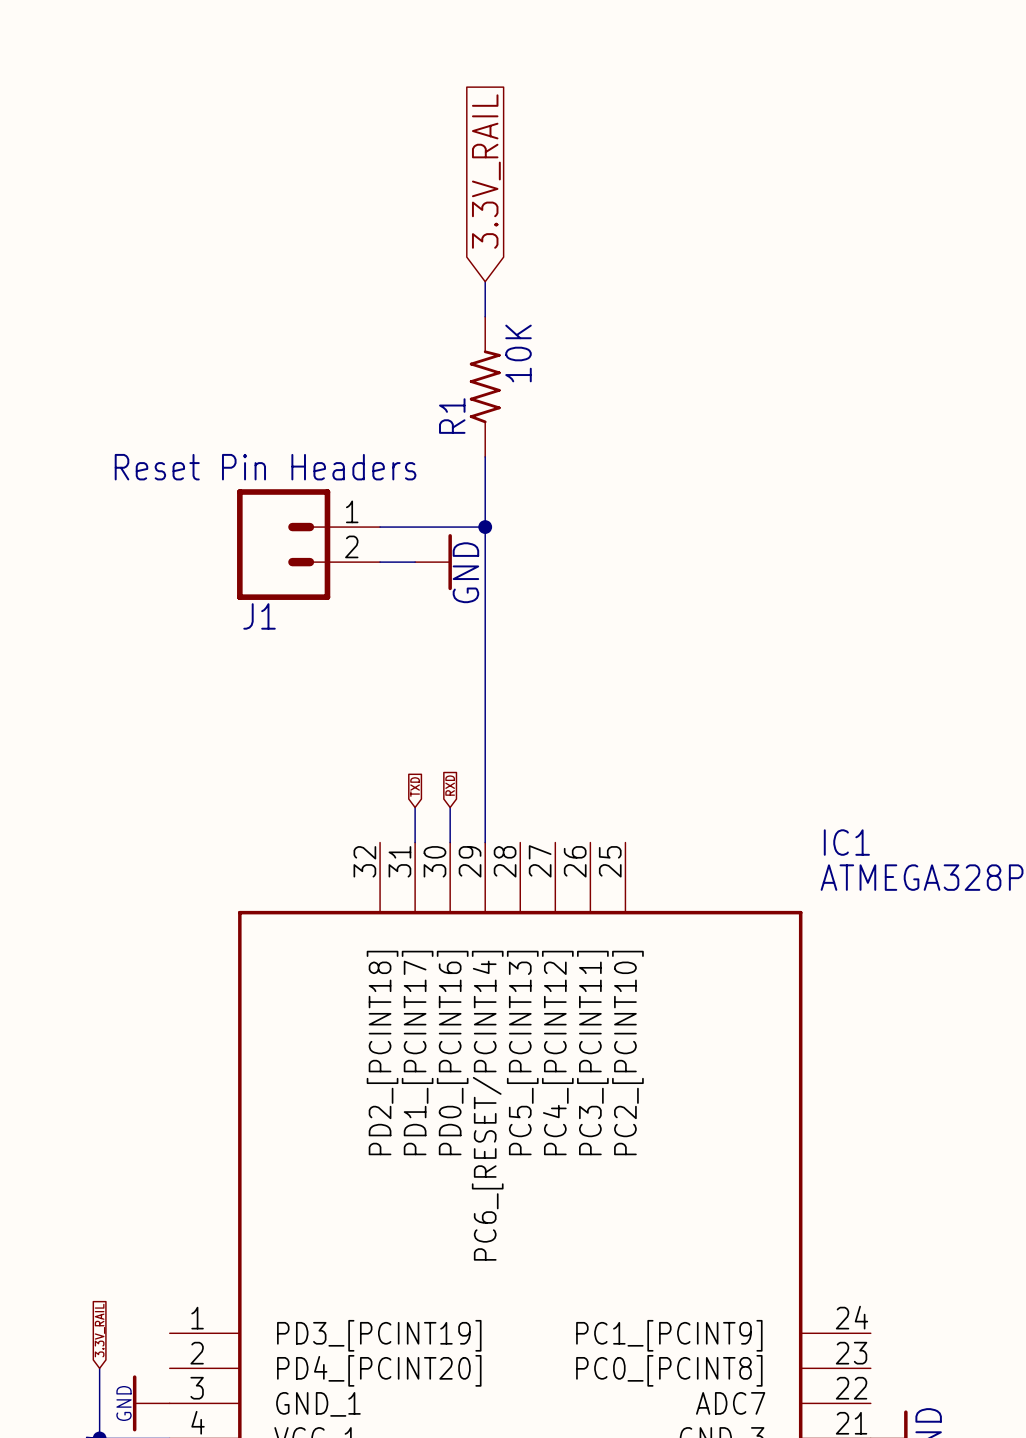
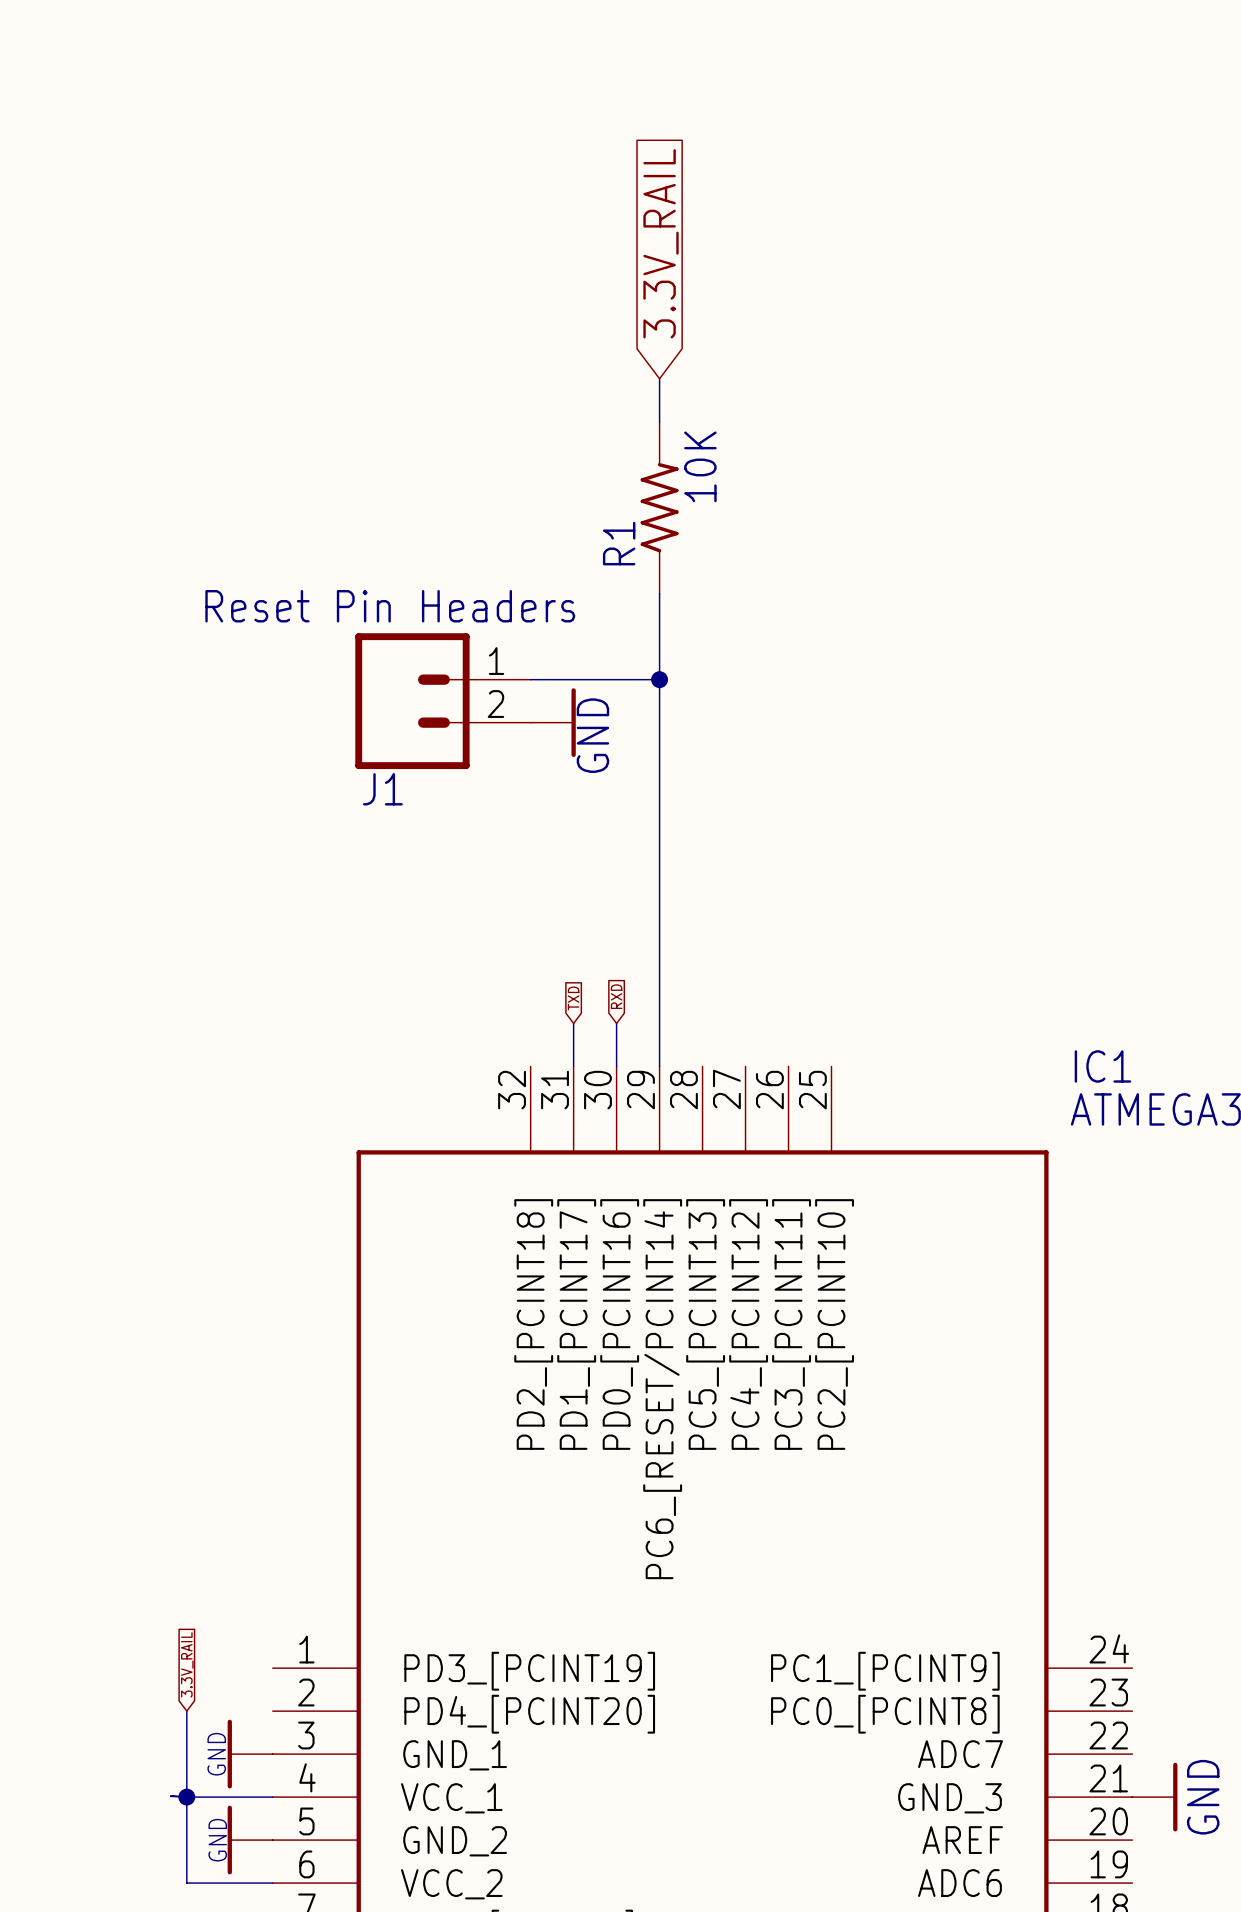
power symbol position: GND (433, 562) -> GND (553, 722)

